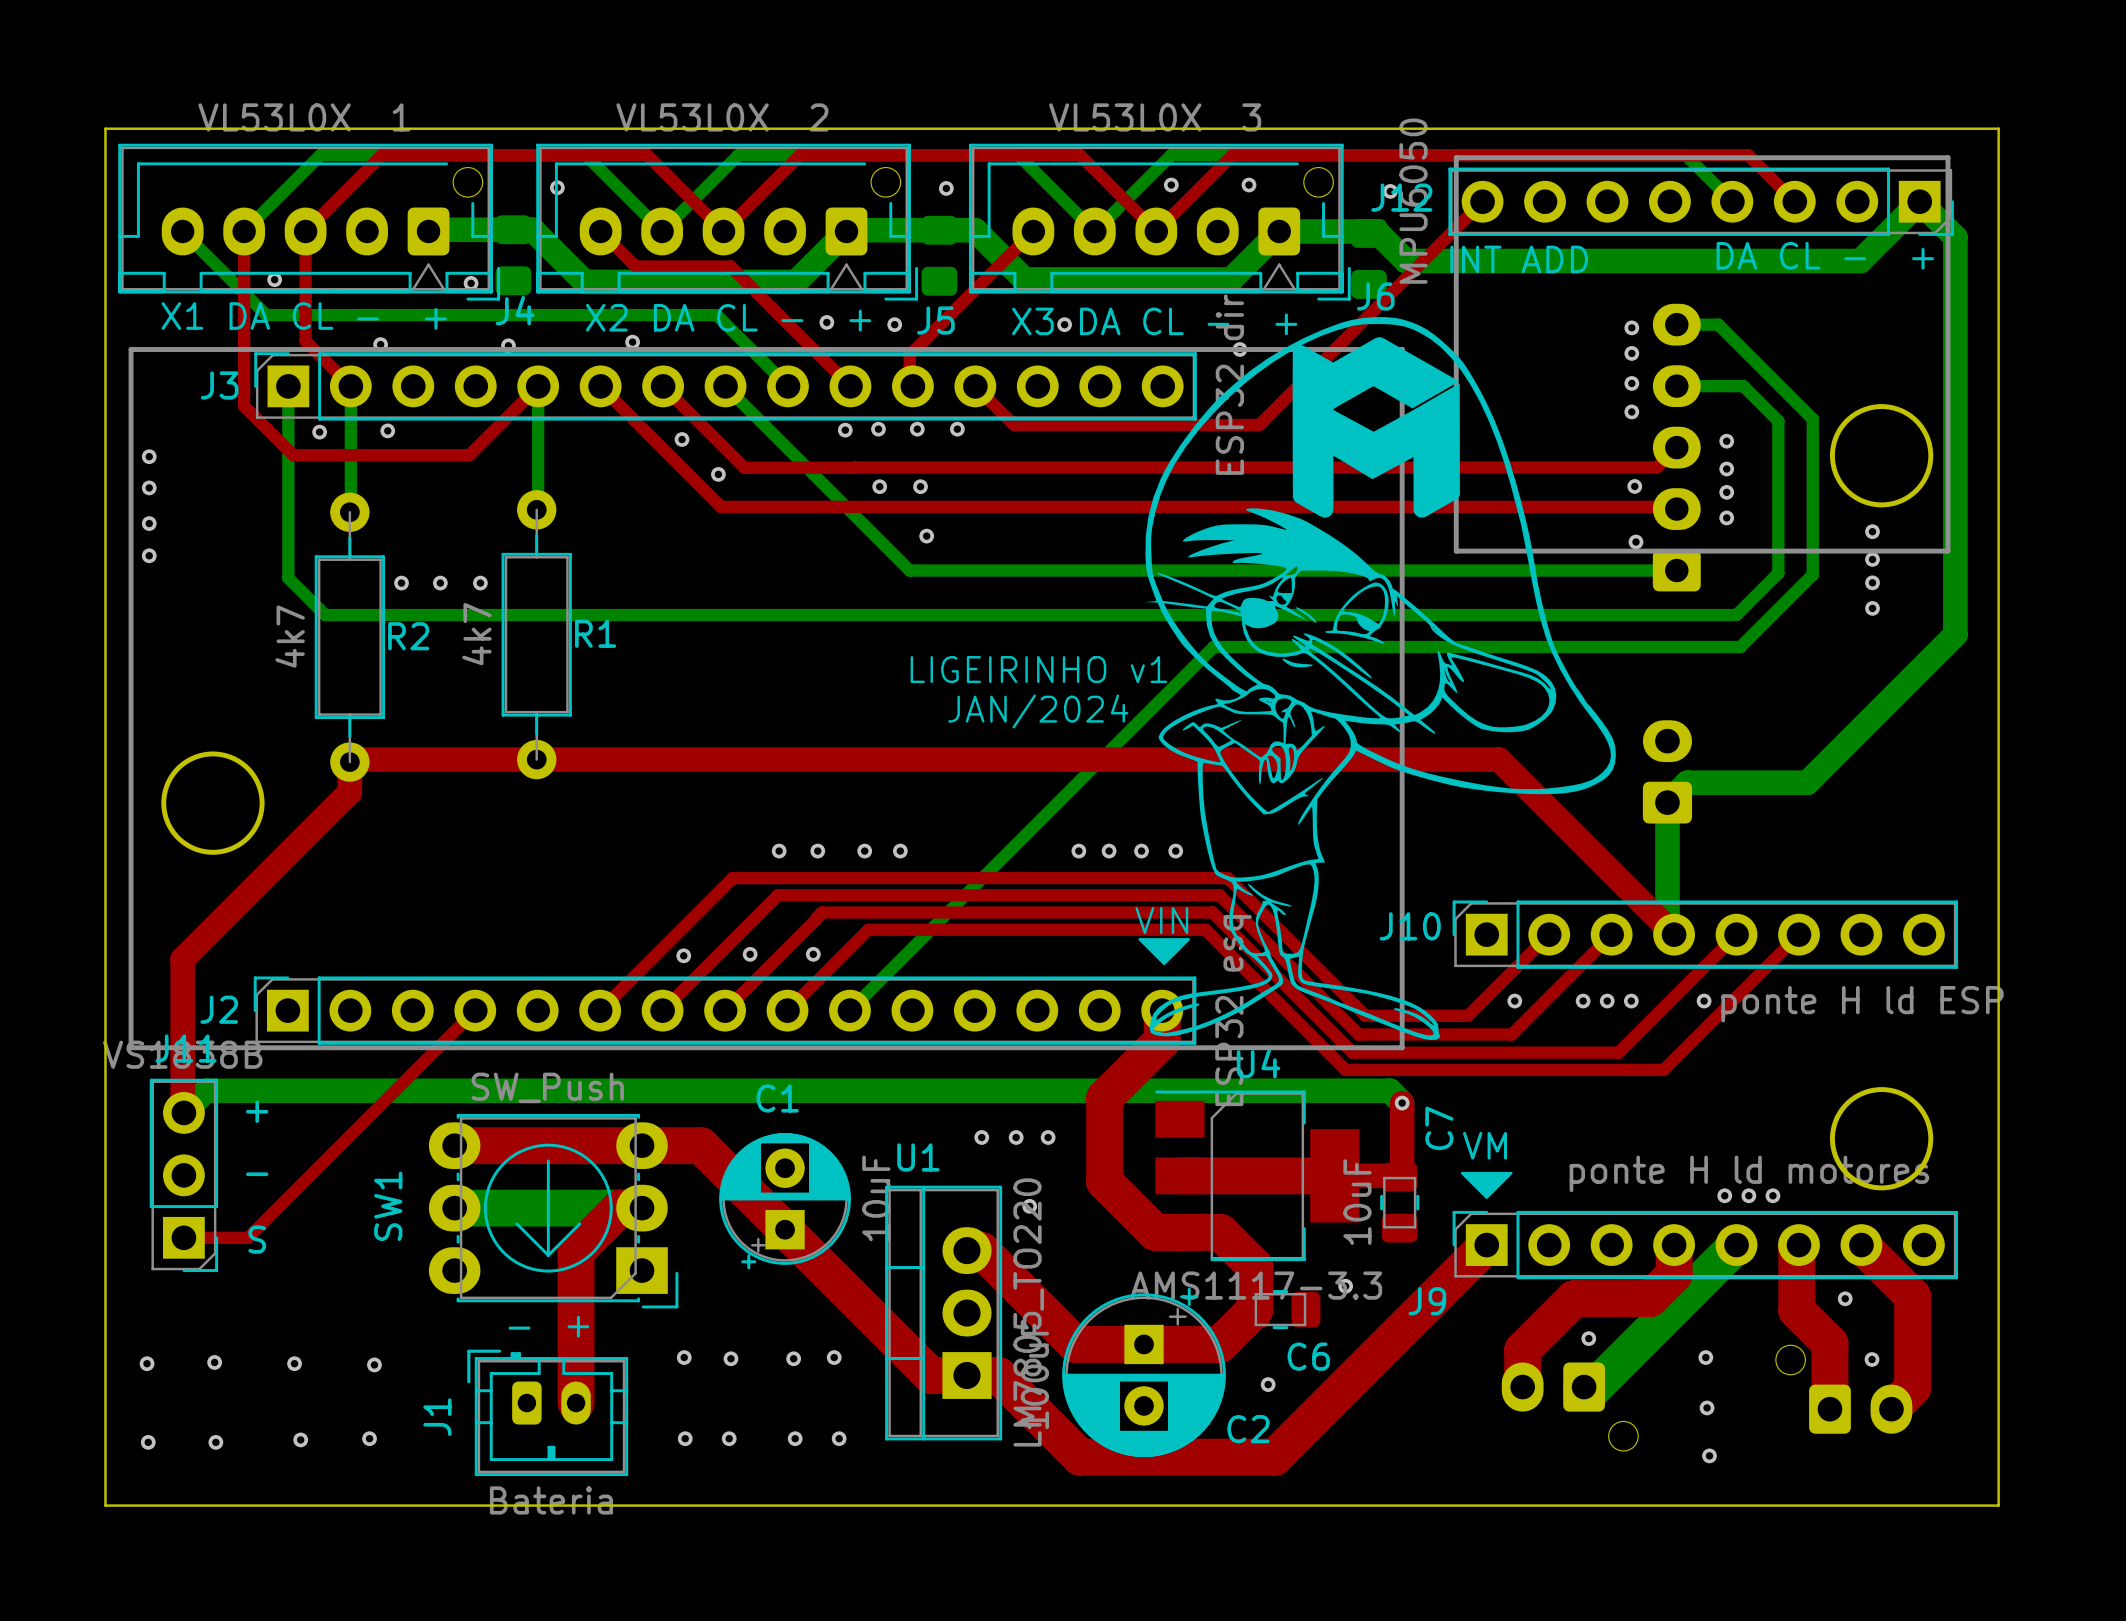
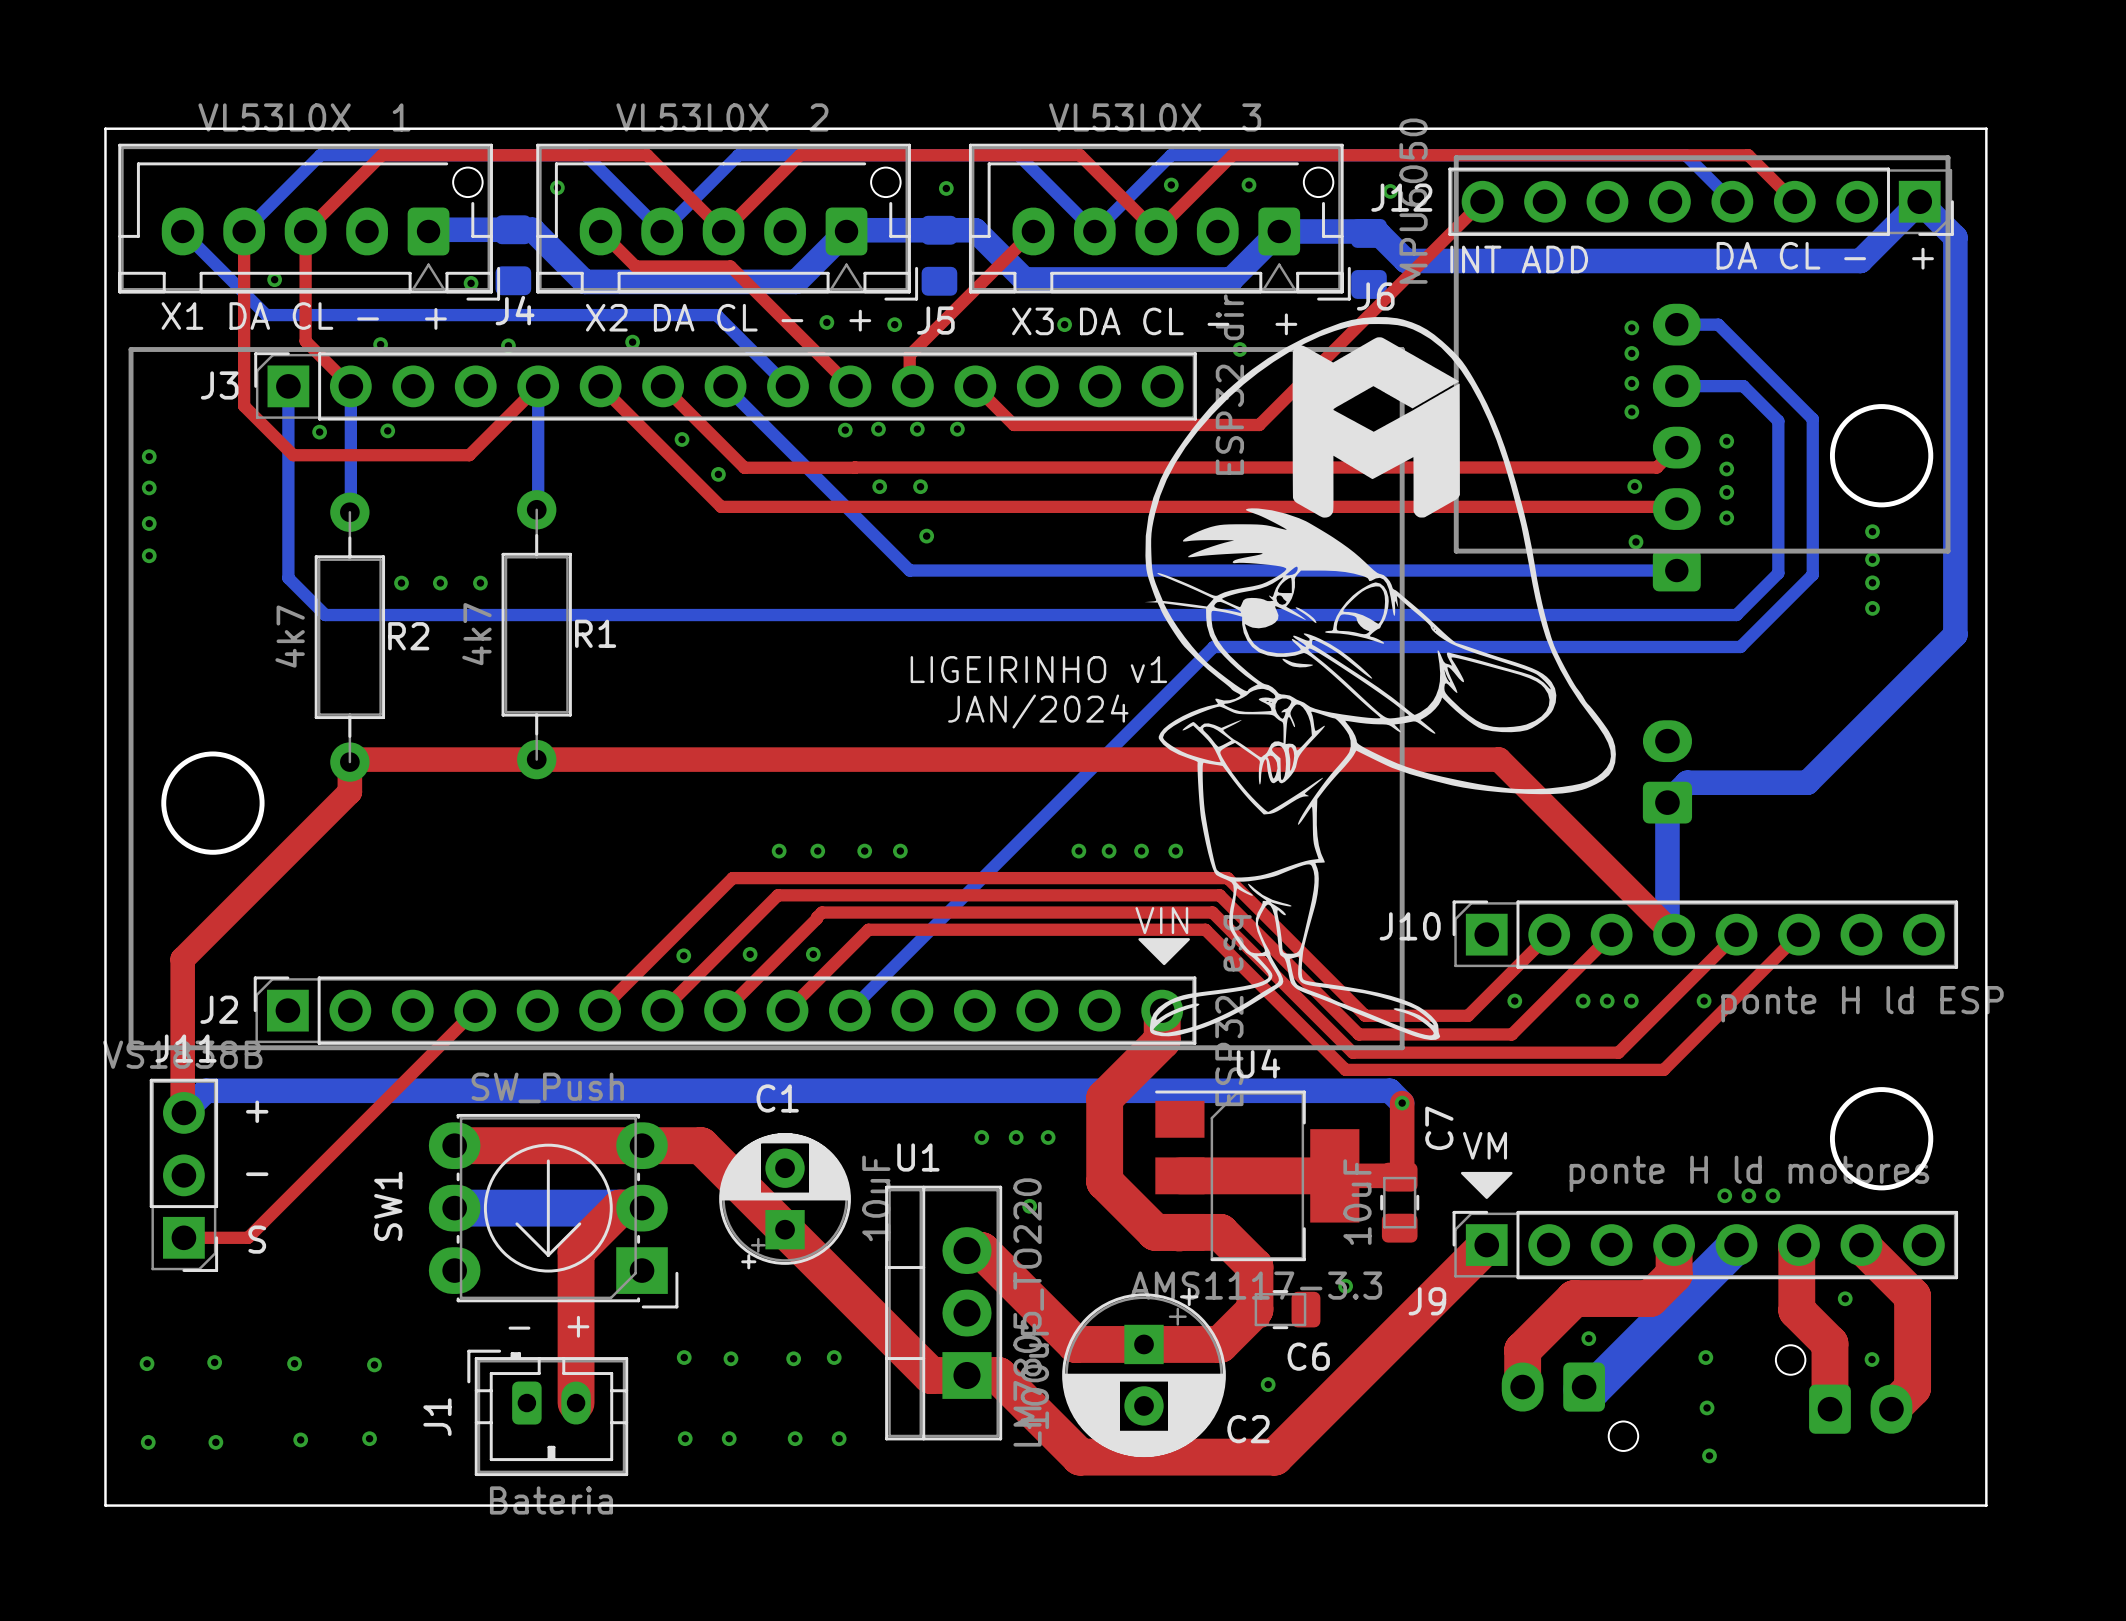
board edge: (1986, 128) (1998, 128) (1998, 1505) (1986, 1505) -> (1986, 128) (1986, 1505)

